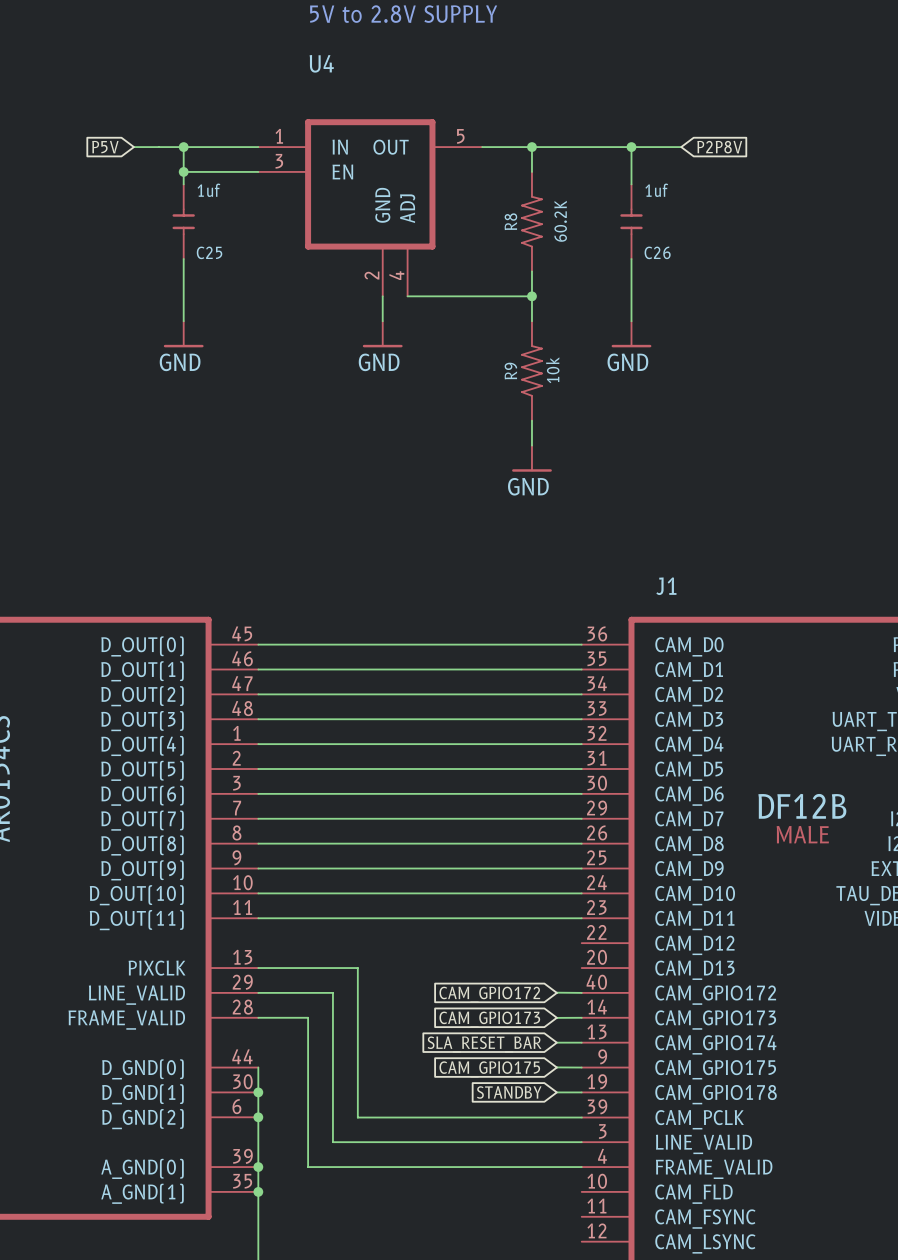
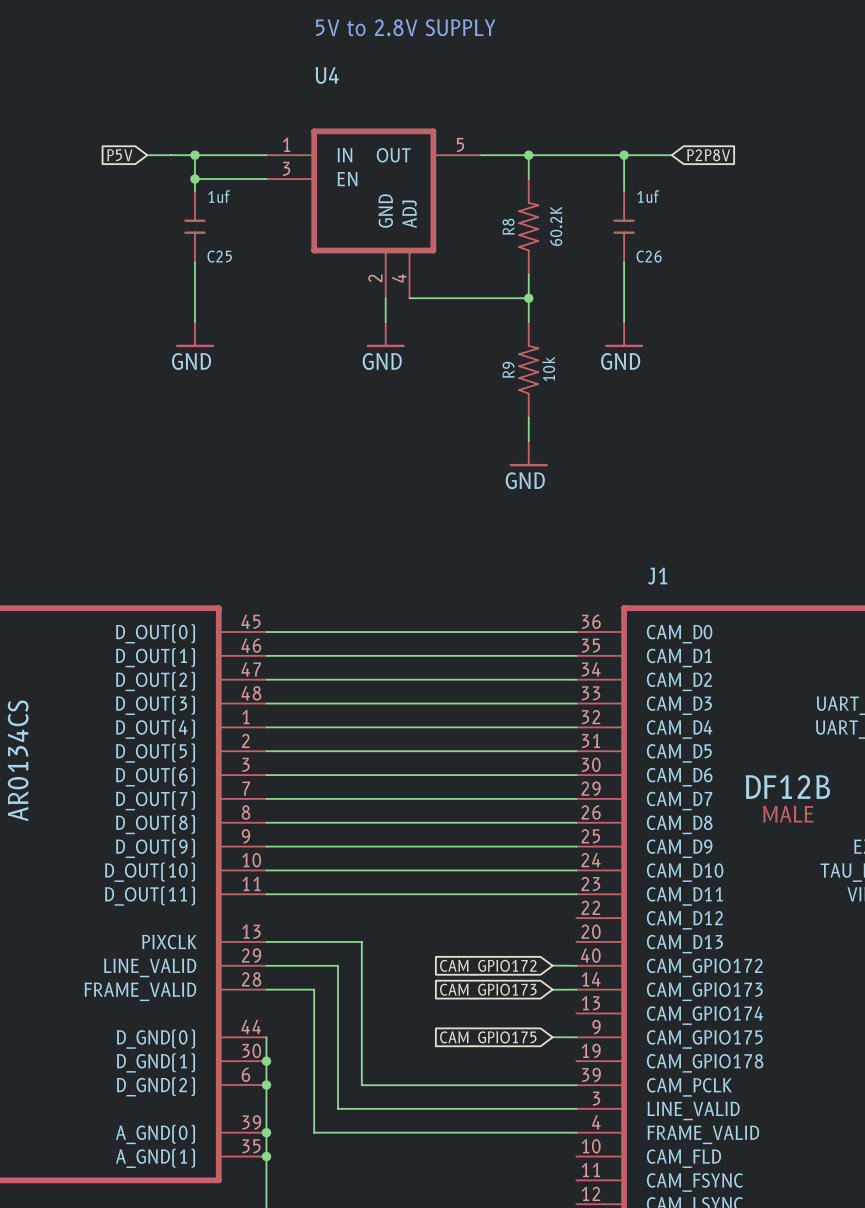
wire: (556, 1042) (581, 1042) -> none
global label: SLA_RESET_BAR (484, 1044) -> none
global label: STANDBY (509, 1092) -> none
wire: (556, 1092) (581, 1092) -> none

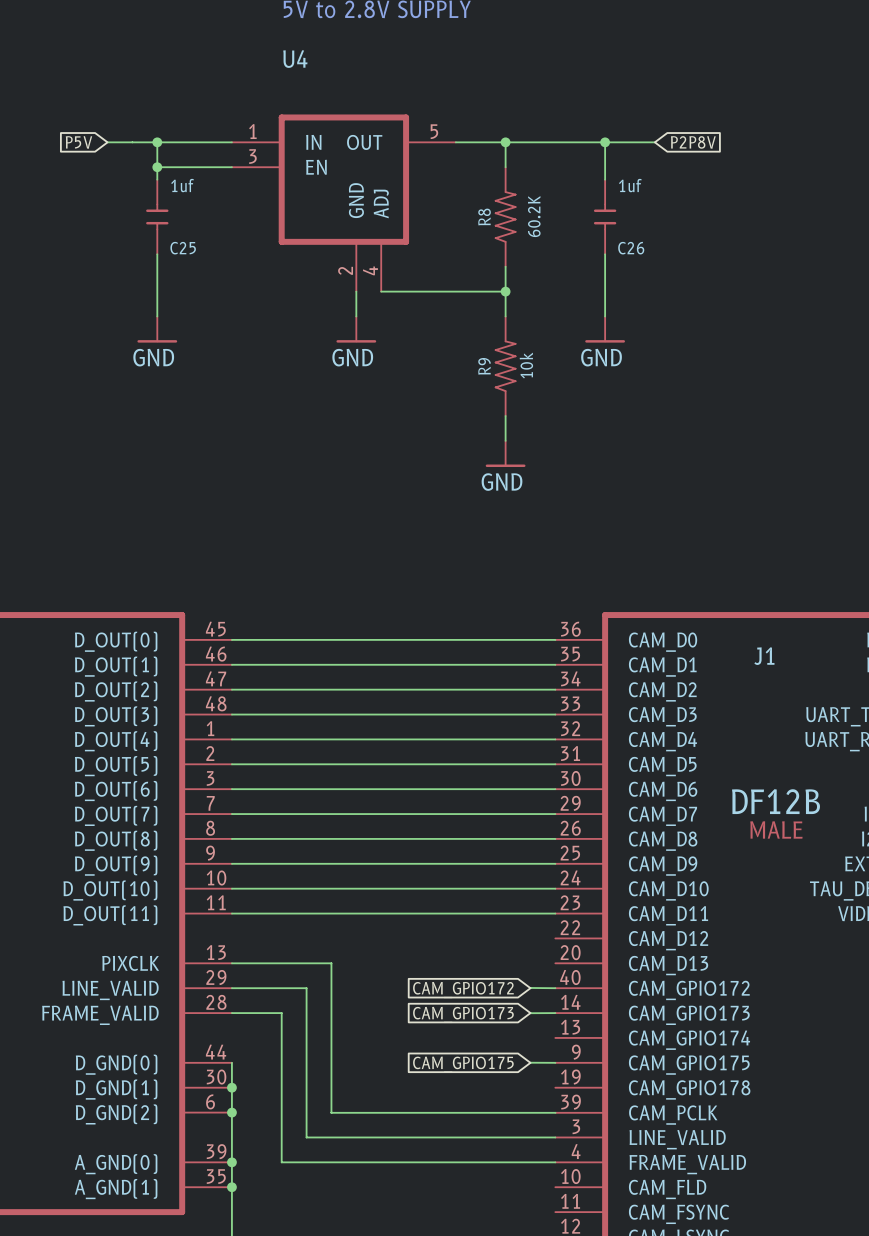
J1 name position: J1 (657, 576) -> J1 (764, 656)

